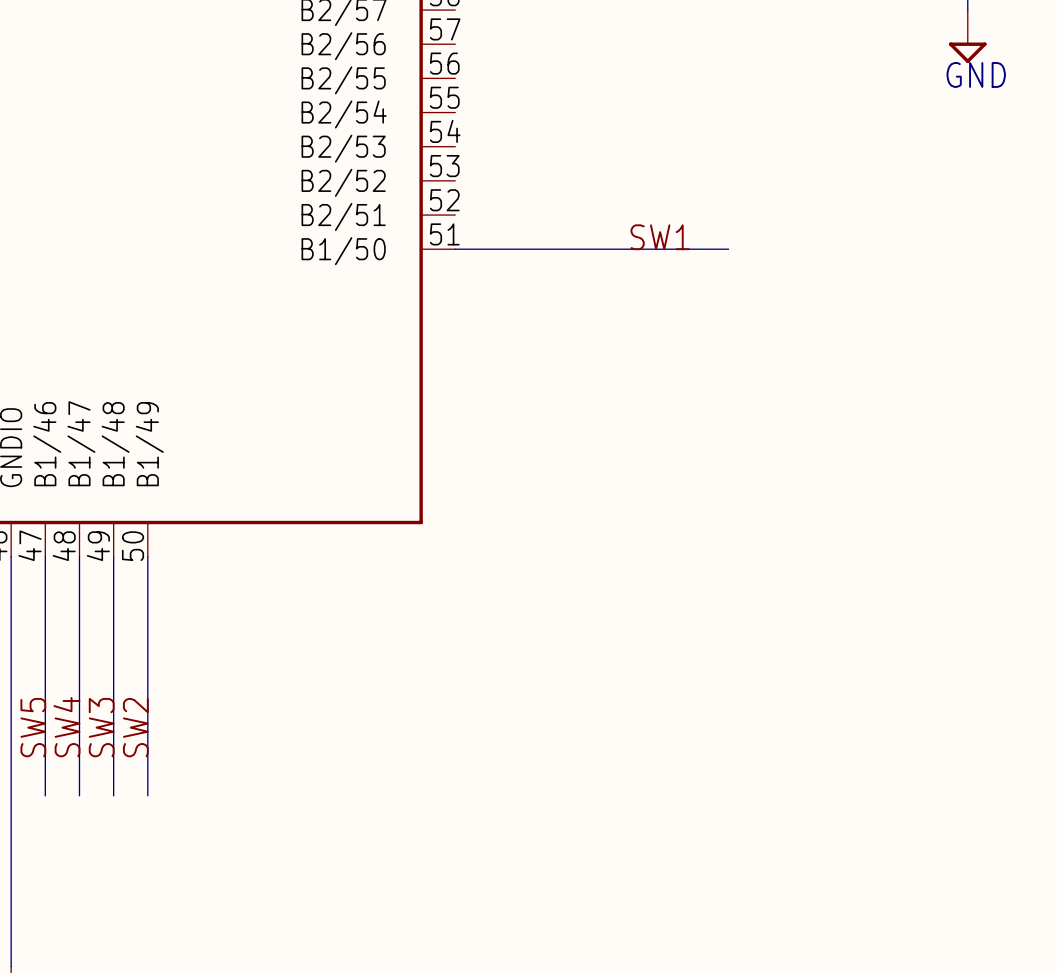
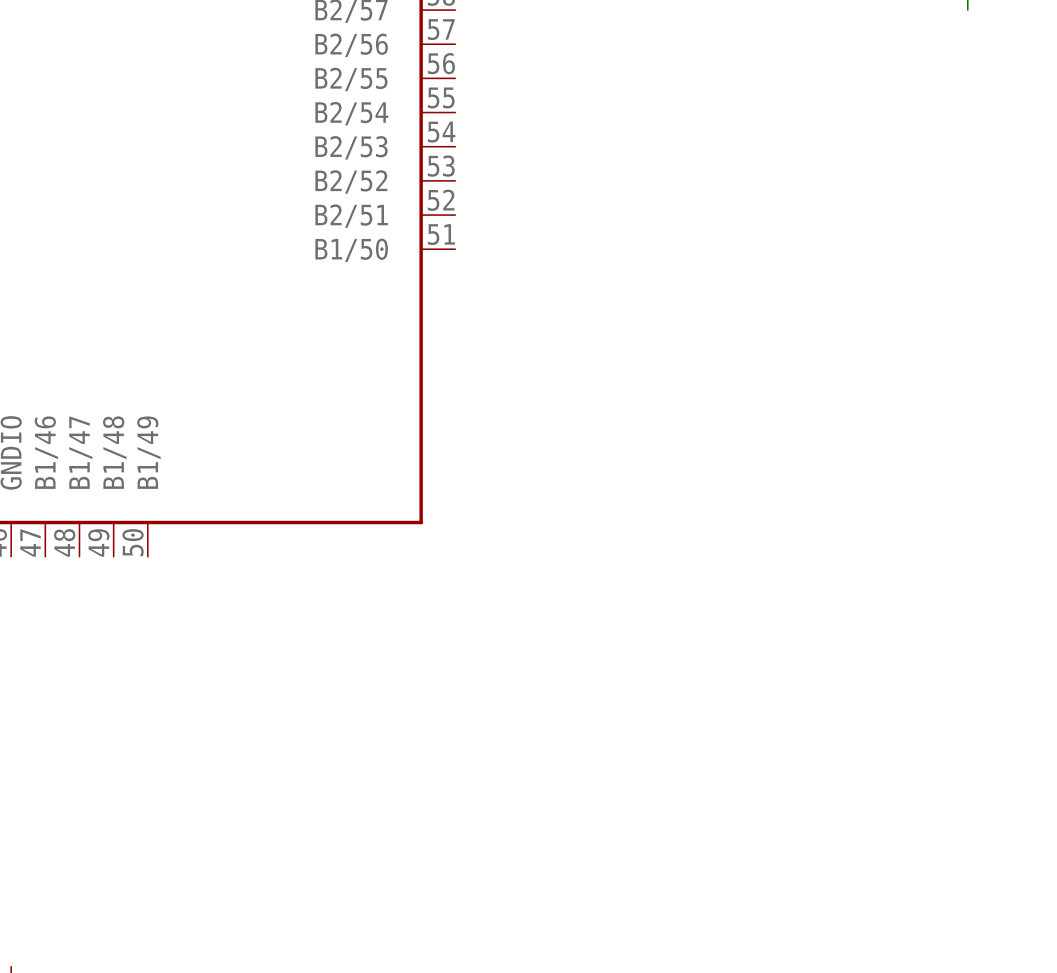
power symbol: GND (967, 36) -> none
label: SW1 (660, 237) -> none
wire: (455, 249) (728, 249) -> none
wire: (11, 556) (11, 966) -> none
wire: (45, 556) (45, 795) -> none
wire: (79, 556) (79, 795) -> none
wire: (113, 556) (113, 795) -> none
wire: (147, 556) (147, 795) -> none
label: SW5 (33, 727) -> none
label: SW4 (66, 727) -> none
label: SW3 (101, 727) -> none
label: SW2 (135, 727) -> none

